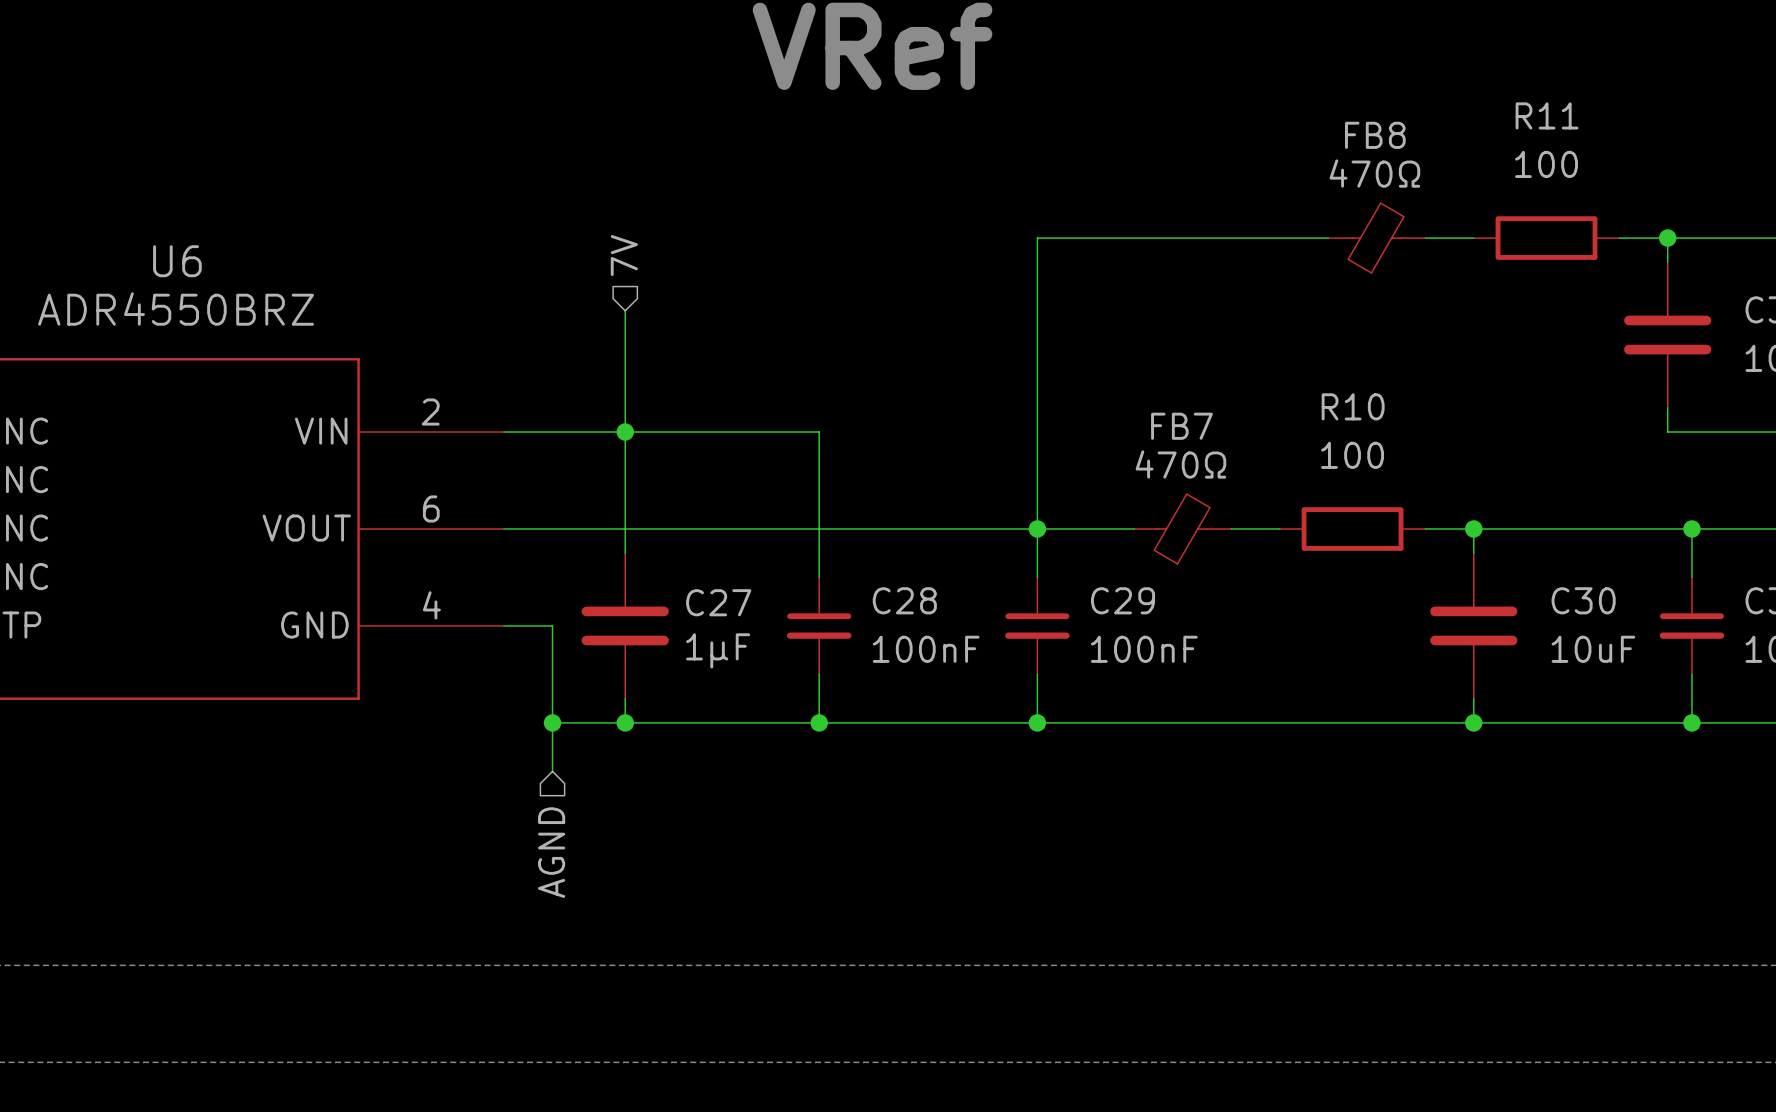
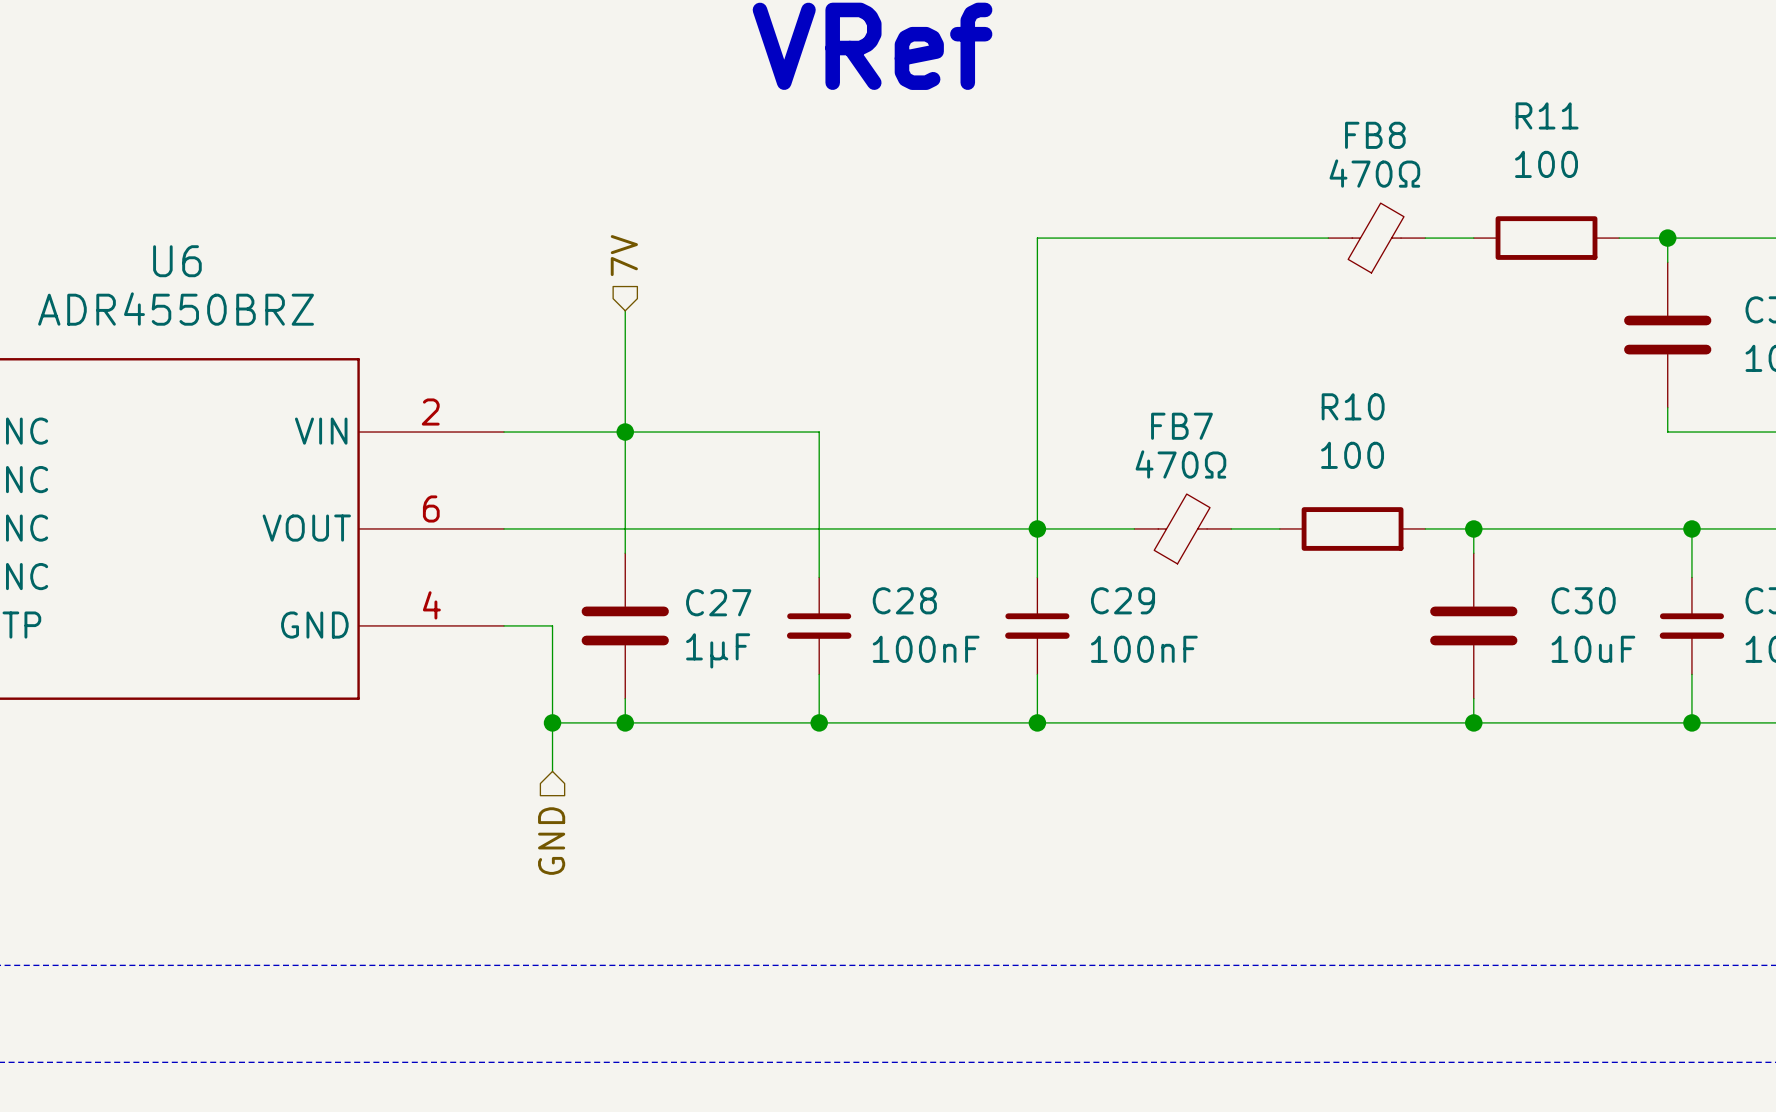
hierarchical label: AGND (551, 852) -> GND (551, 841)

